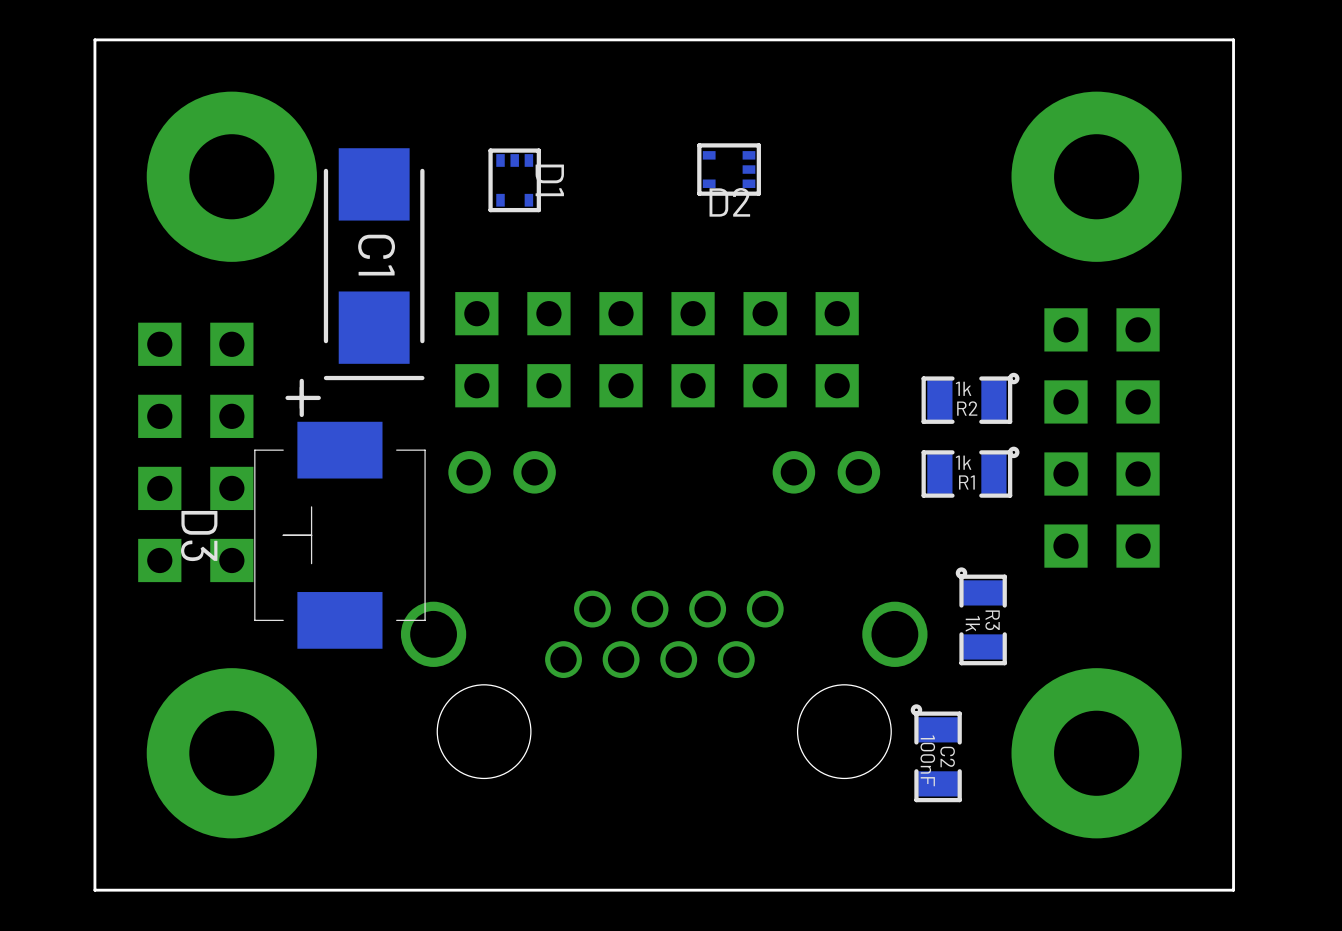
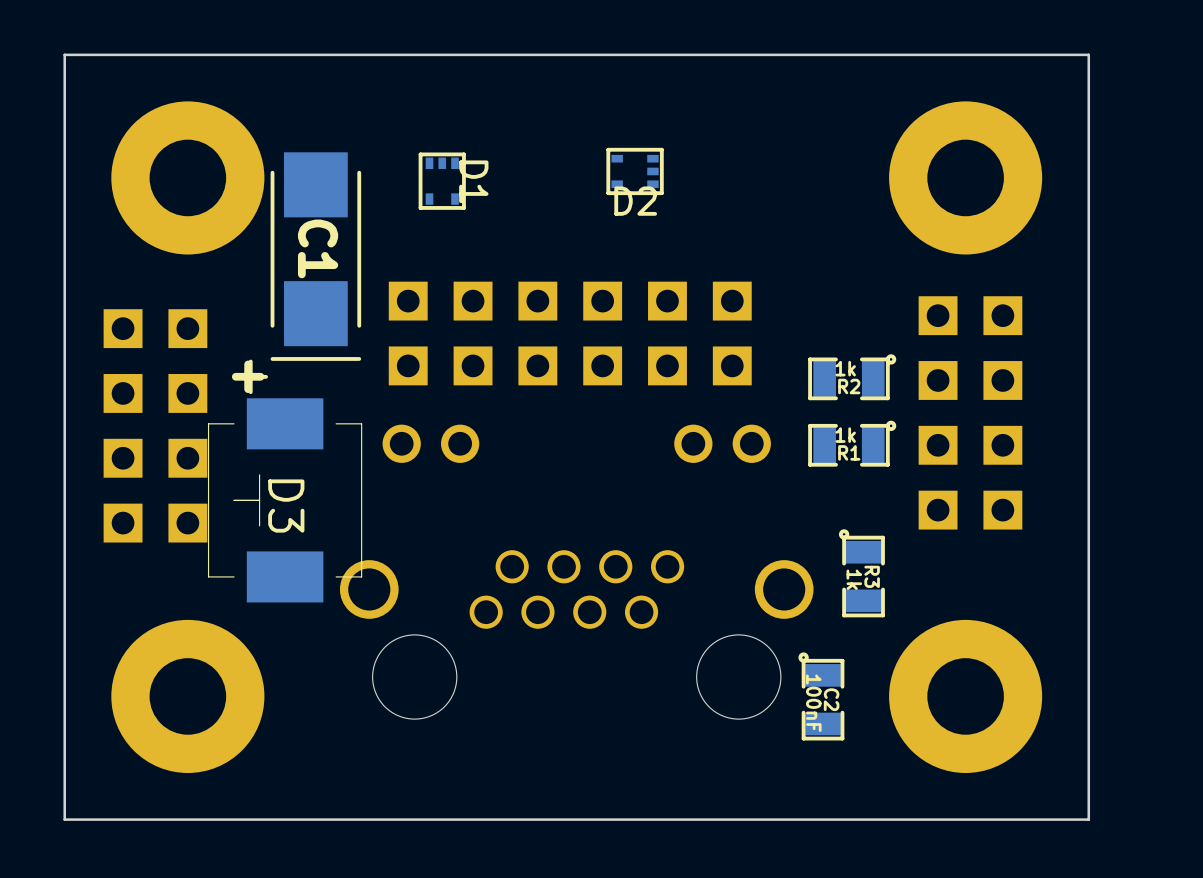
D3 name position: D3 (199, 536) -> D3 (286, 506)

